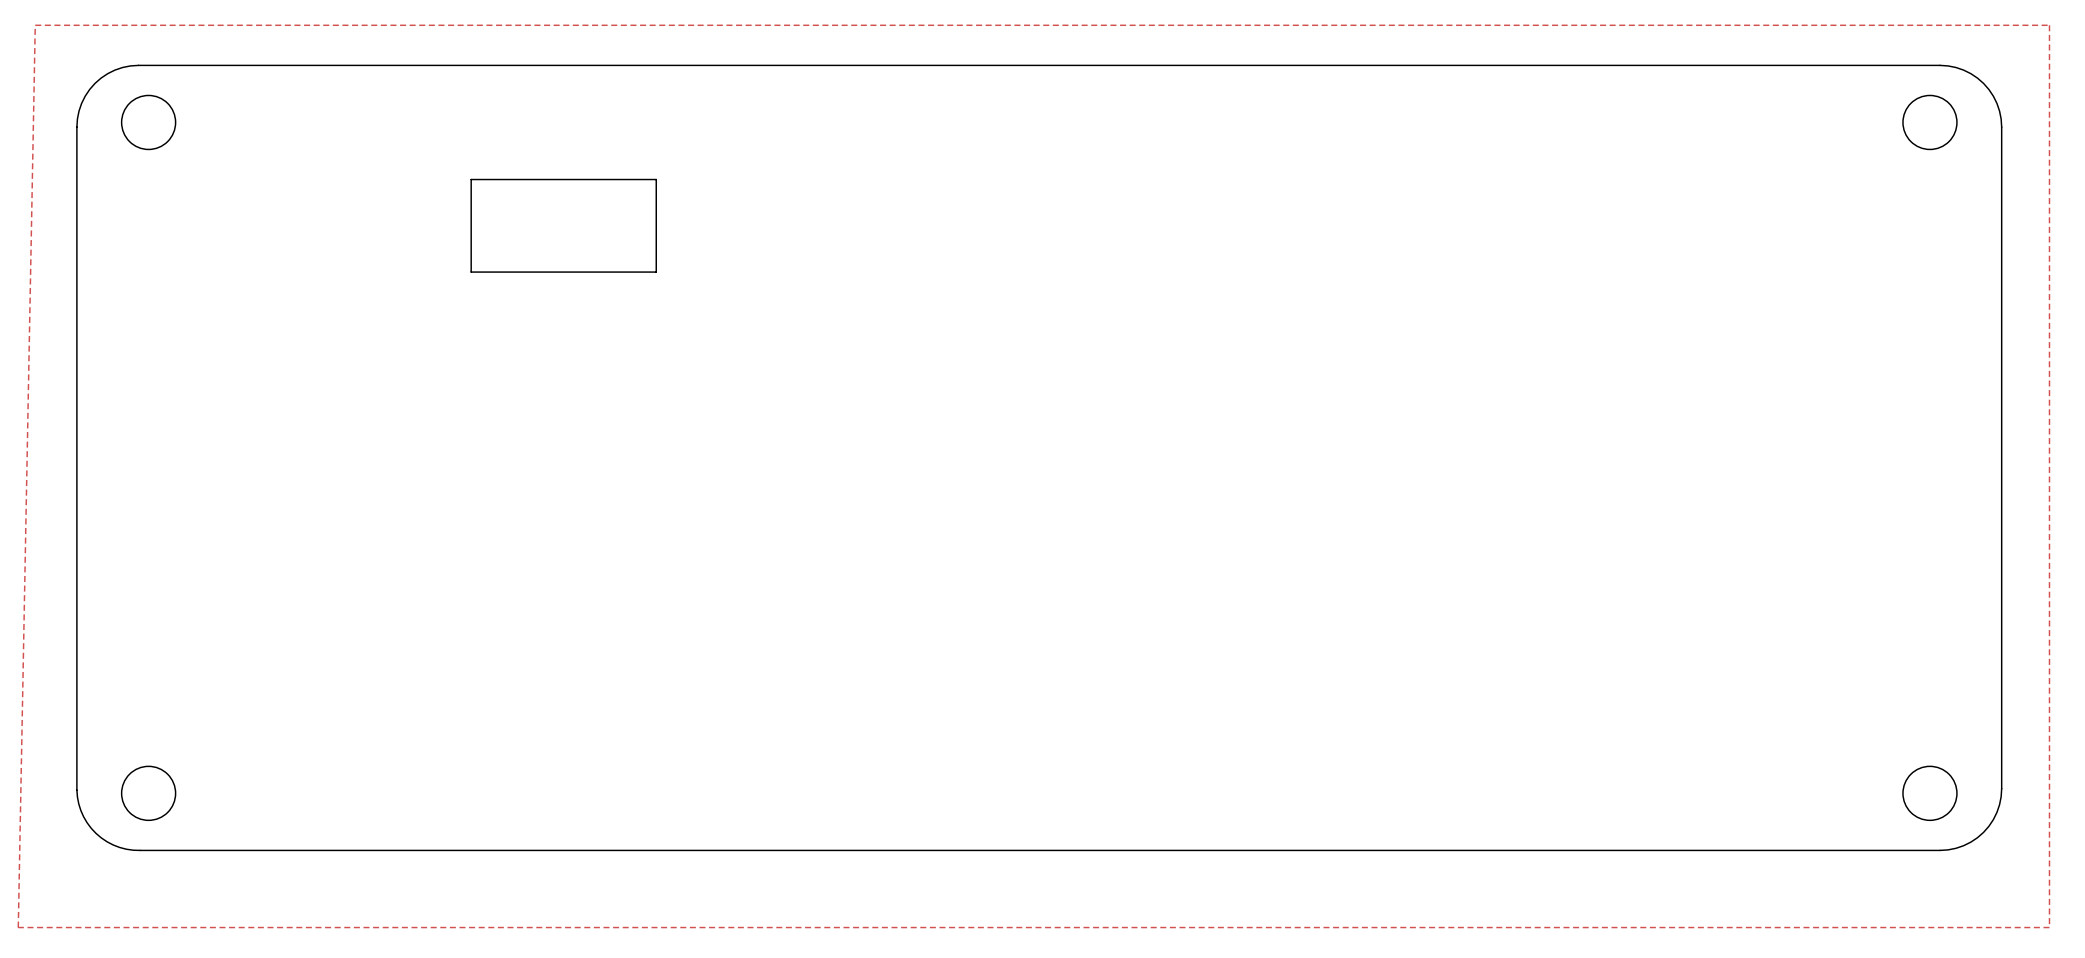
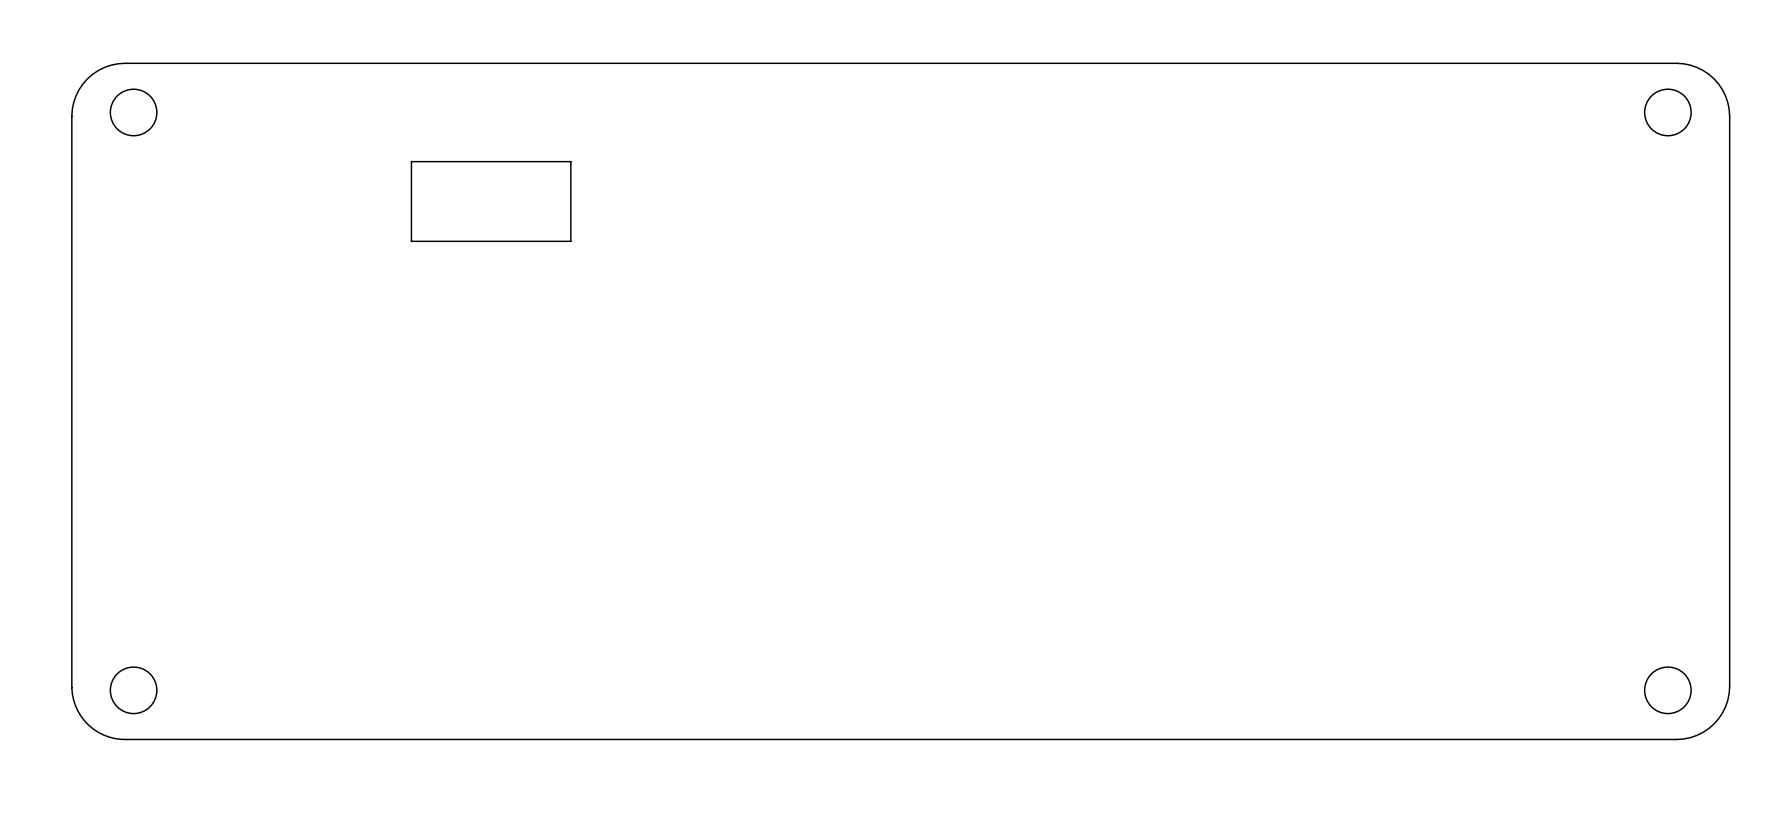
zone outline: (35, 25) (18, 927) (2049, 927) (2049, 25) (35, 25) -> none

